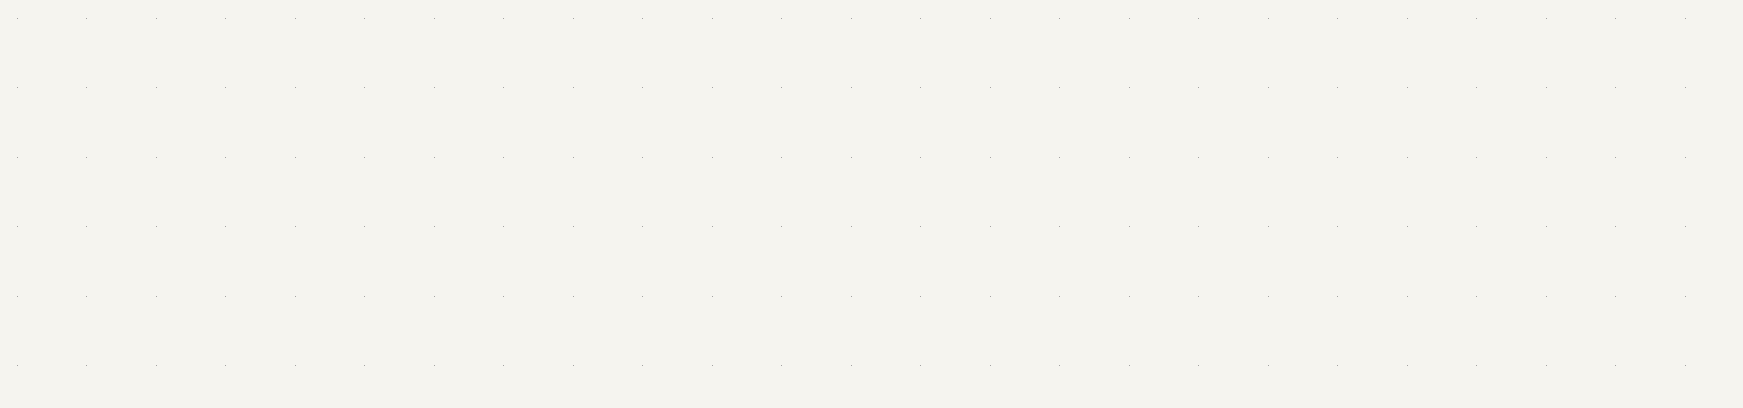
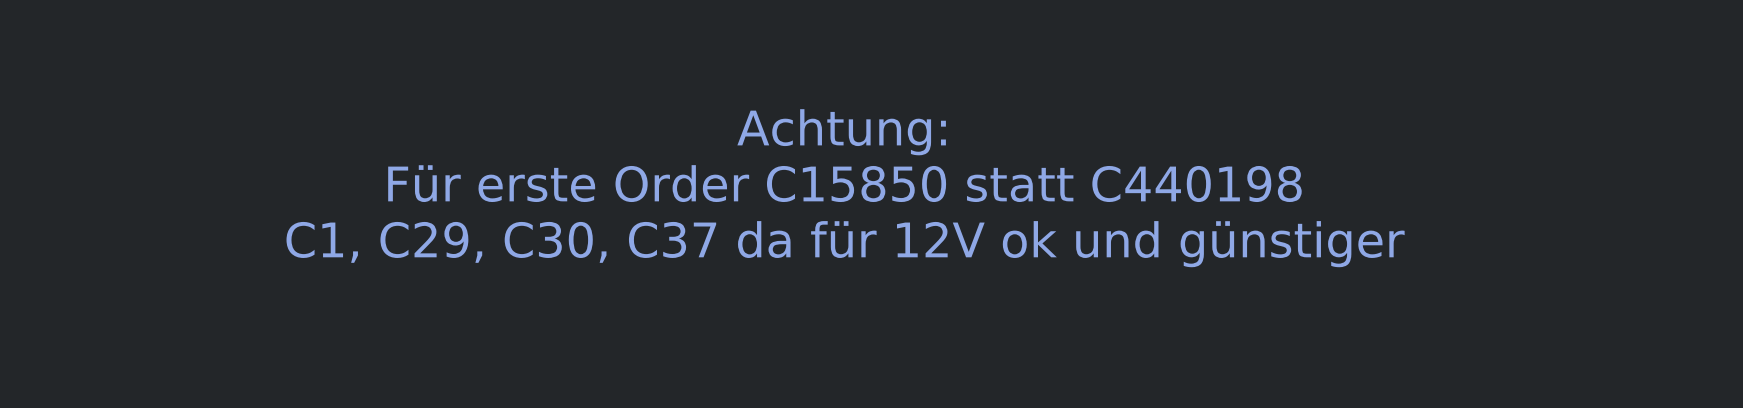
text: none -> Achtung: (841, 132)
text: none -> Für erste Order C15850 statt C440198 (844, 183)
text: none -> C1, C29, C30, C37 da für 12V ok und günstiger (845, 244)

